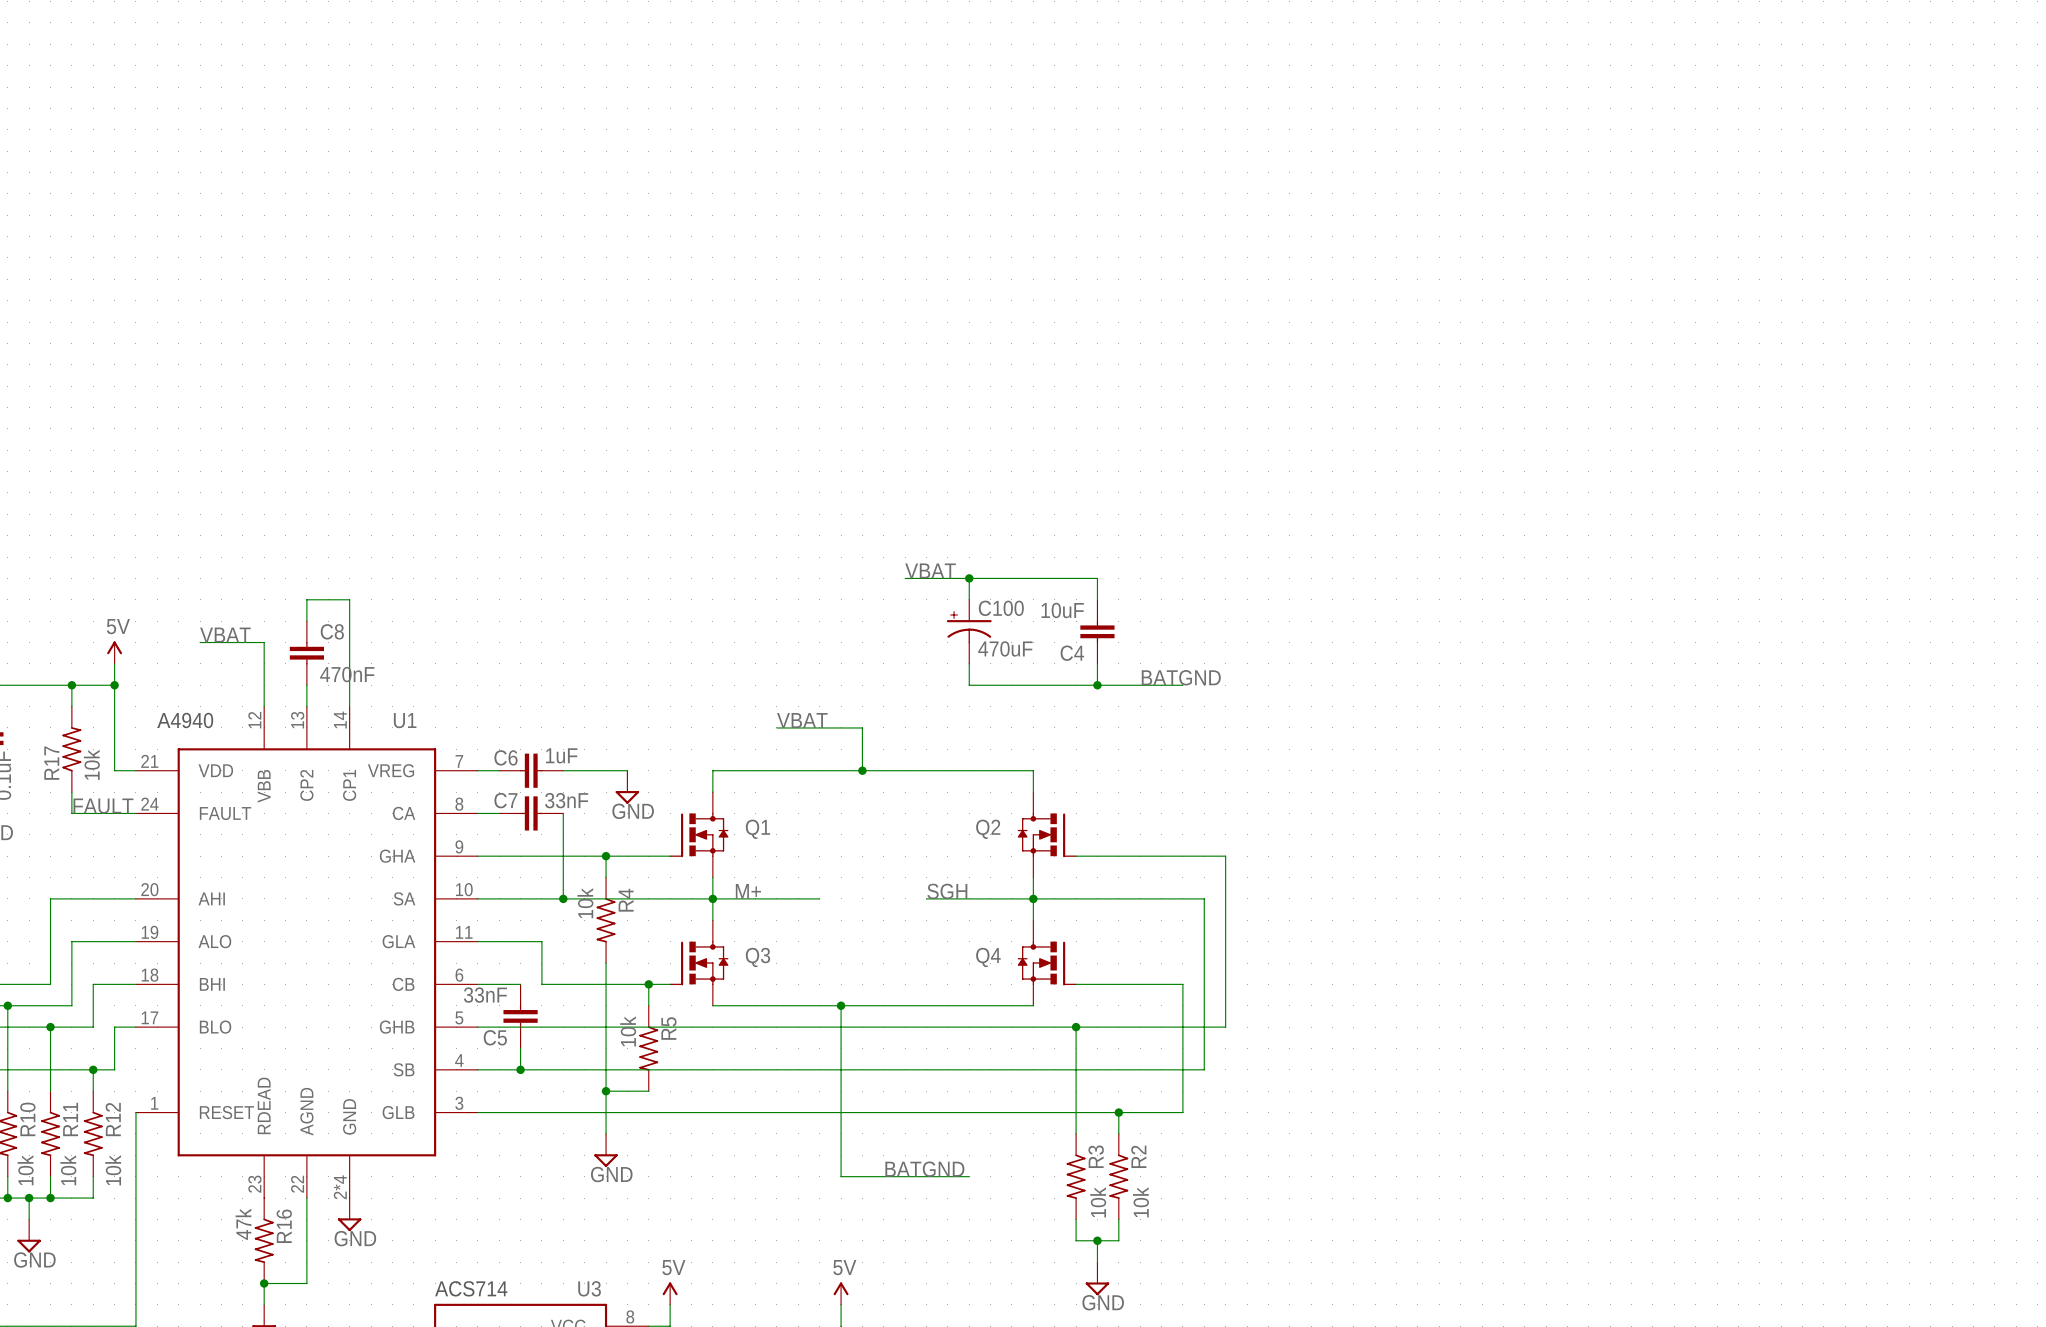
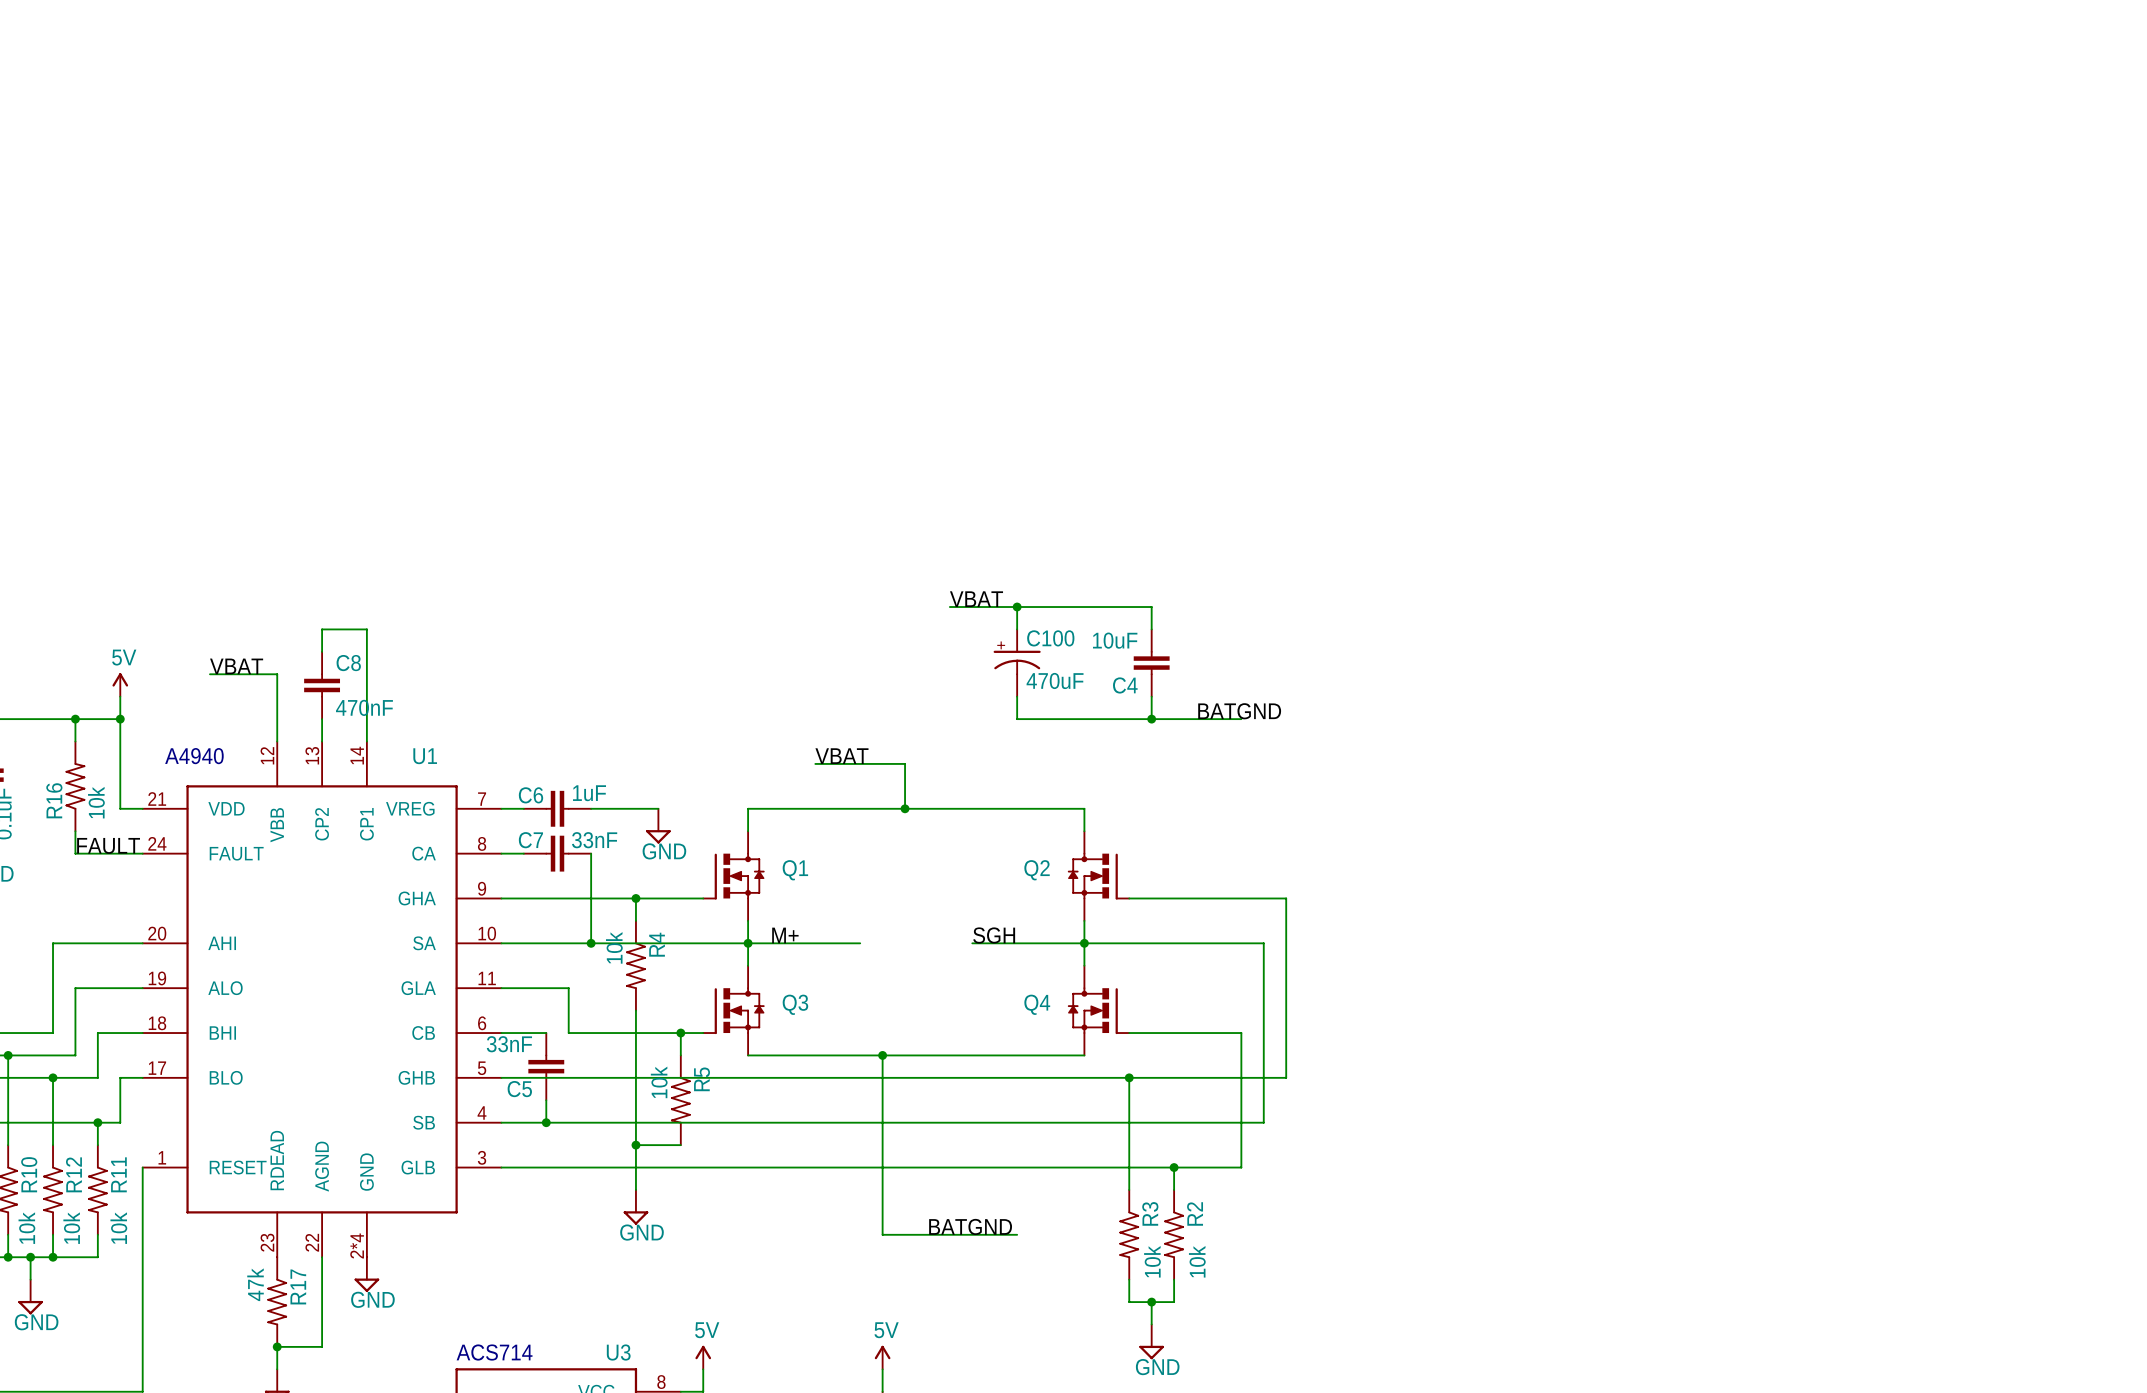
R17 name: R17 (51, 763) -> R16 (54, 800)
R11 name: R11 (70, 1119) -> R12 (73, 1174)
R12 name: R12 (113, 1119) -> R11 (118, 1174)
R16 name: R16 (284, 1226) -> R17 (298, 1286)

